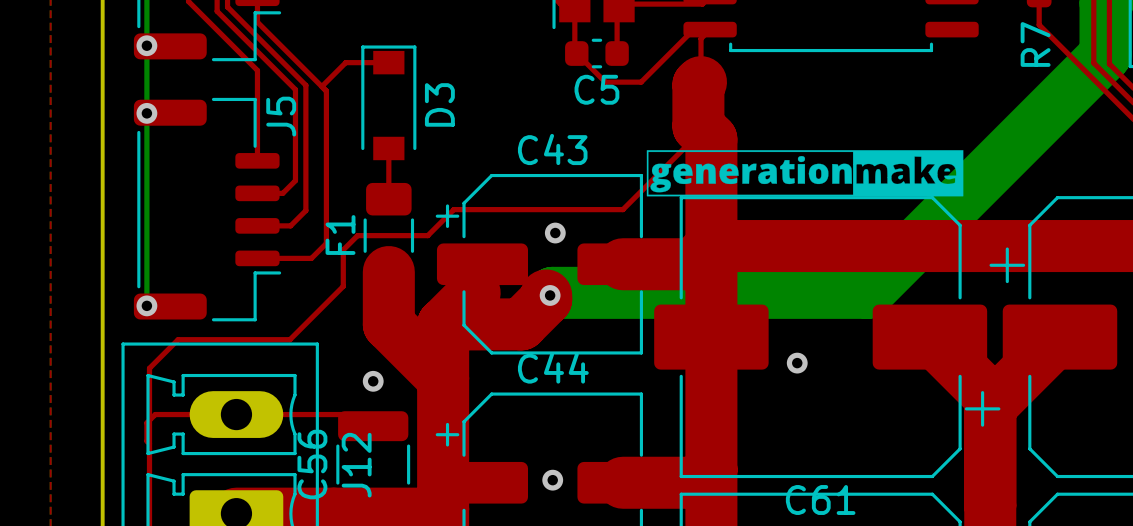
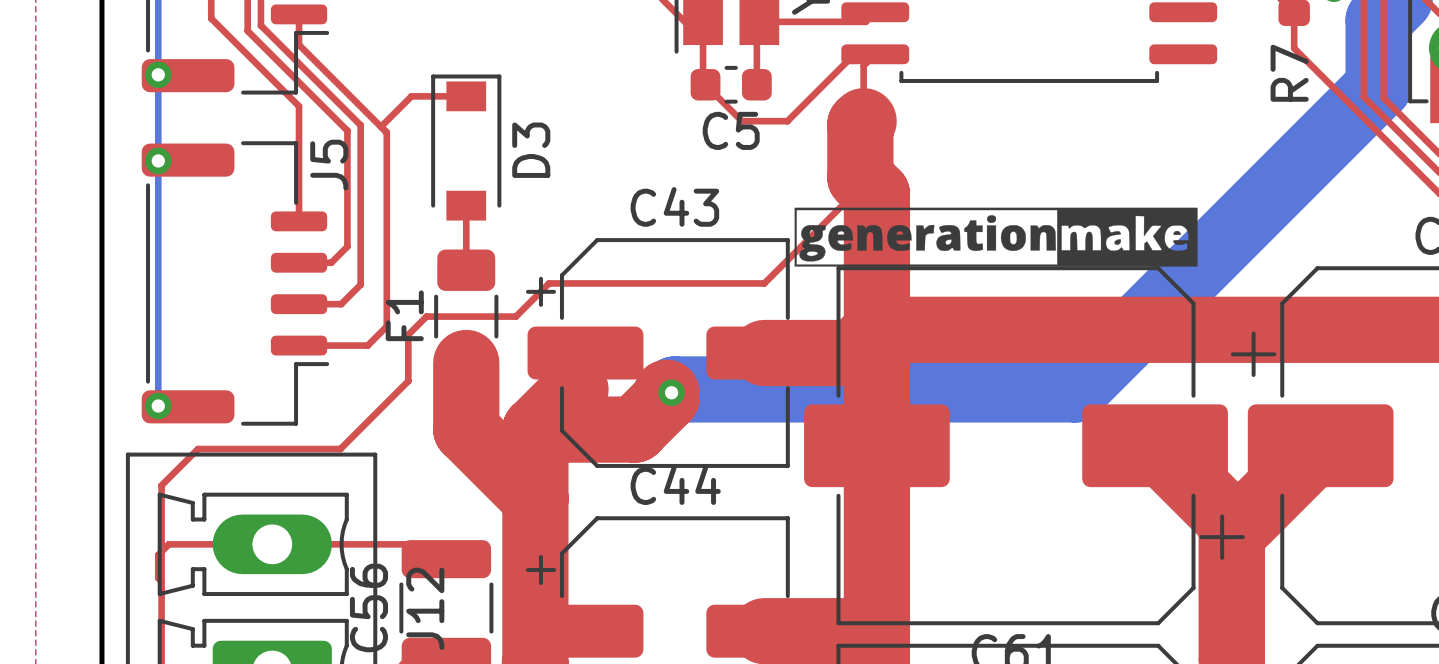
via: (555, 233) -> none
via: (797, 363) -> none
via: (373, 381) -> none
via: (552, 480) -> none

